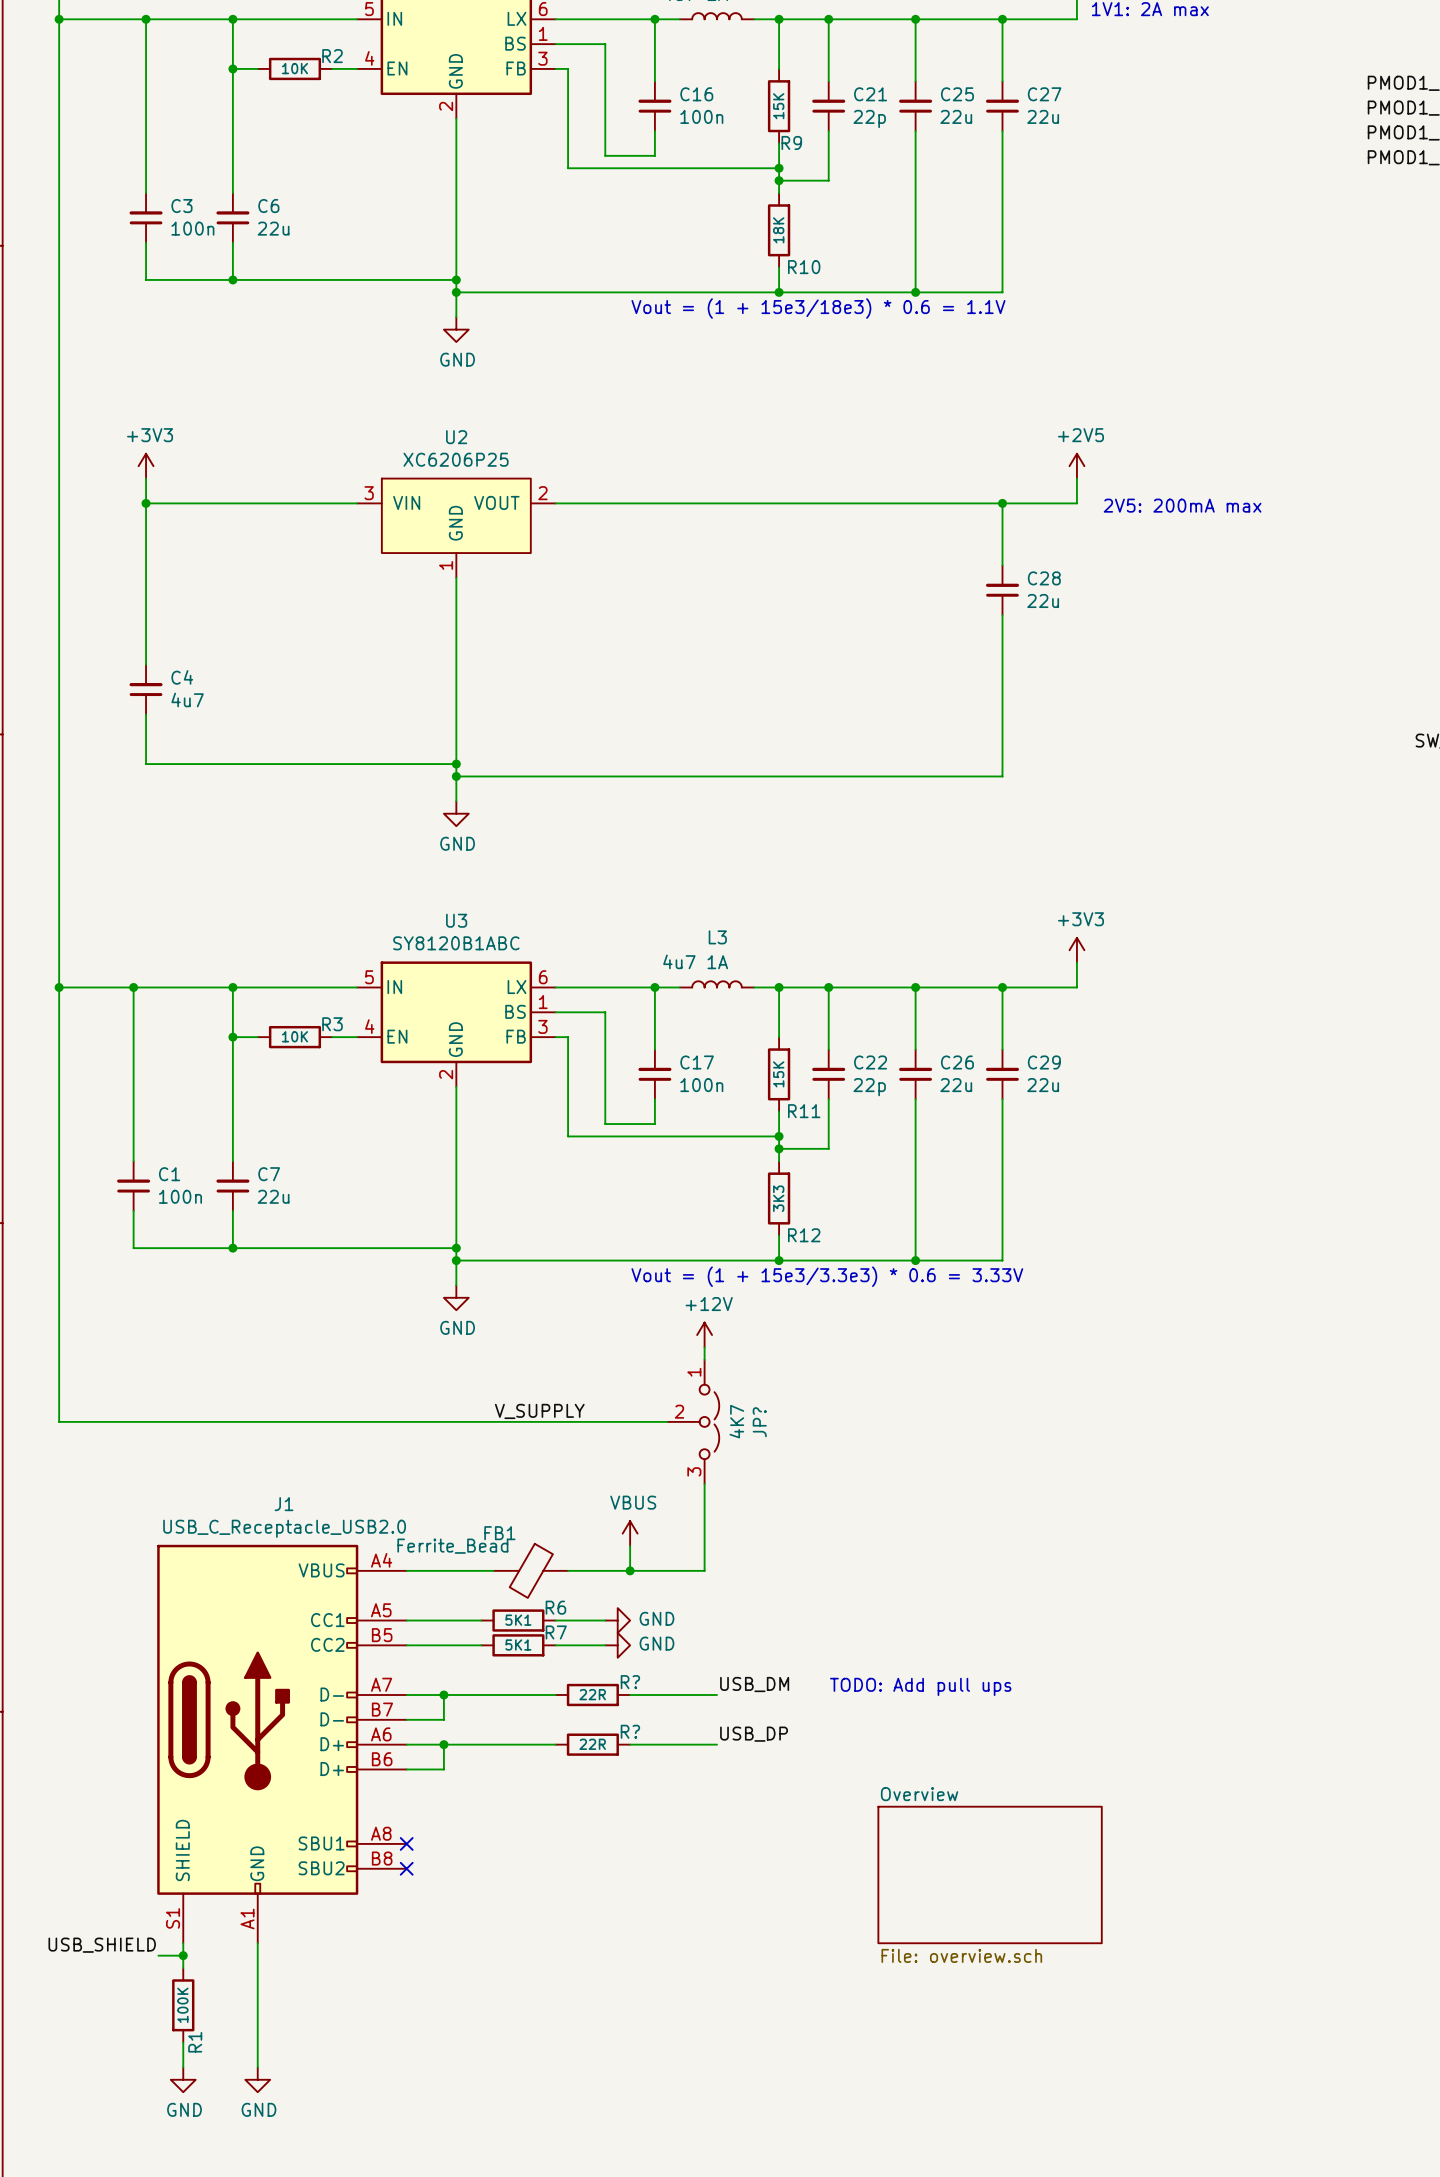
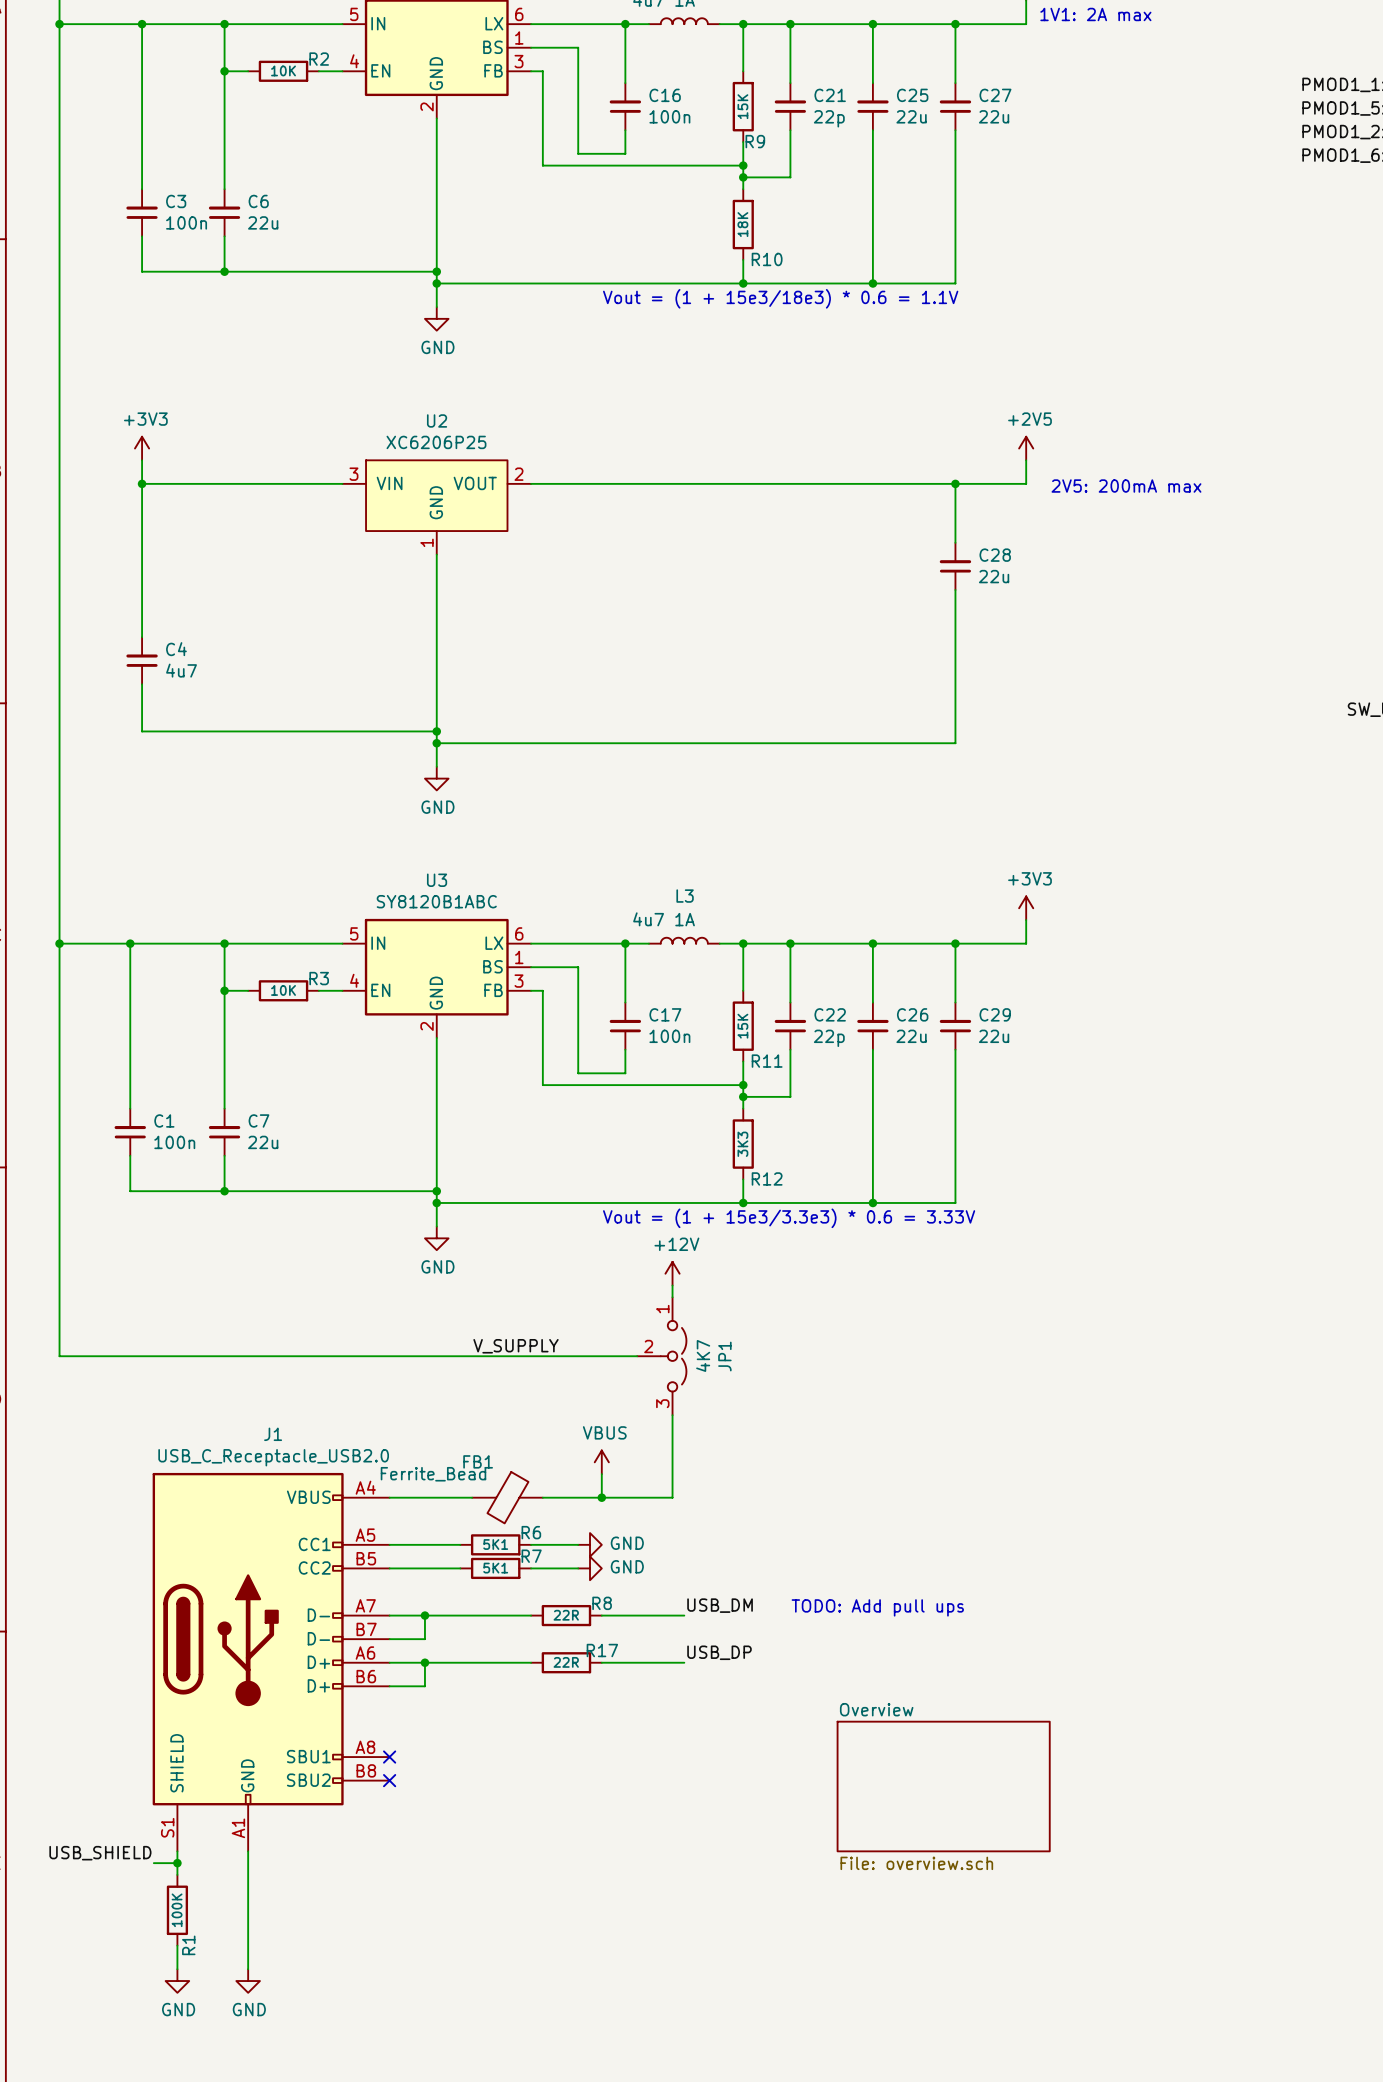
JP? name: JP? (759, 1422) -> JP1 (724, 1356)
R? name: R? (630, 1682) -> R8 (602, 1603)
R? name: R? (630, 1731) -> R17 (602, 1650)

